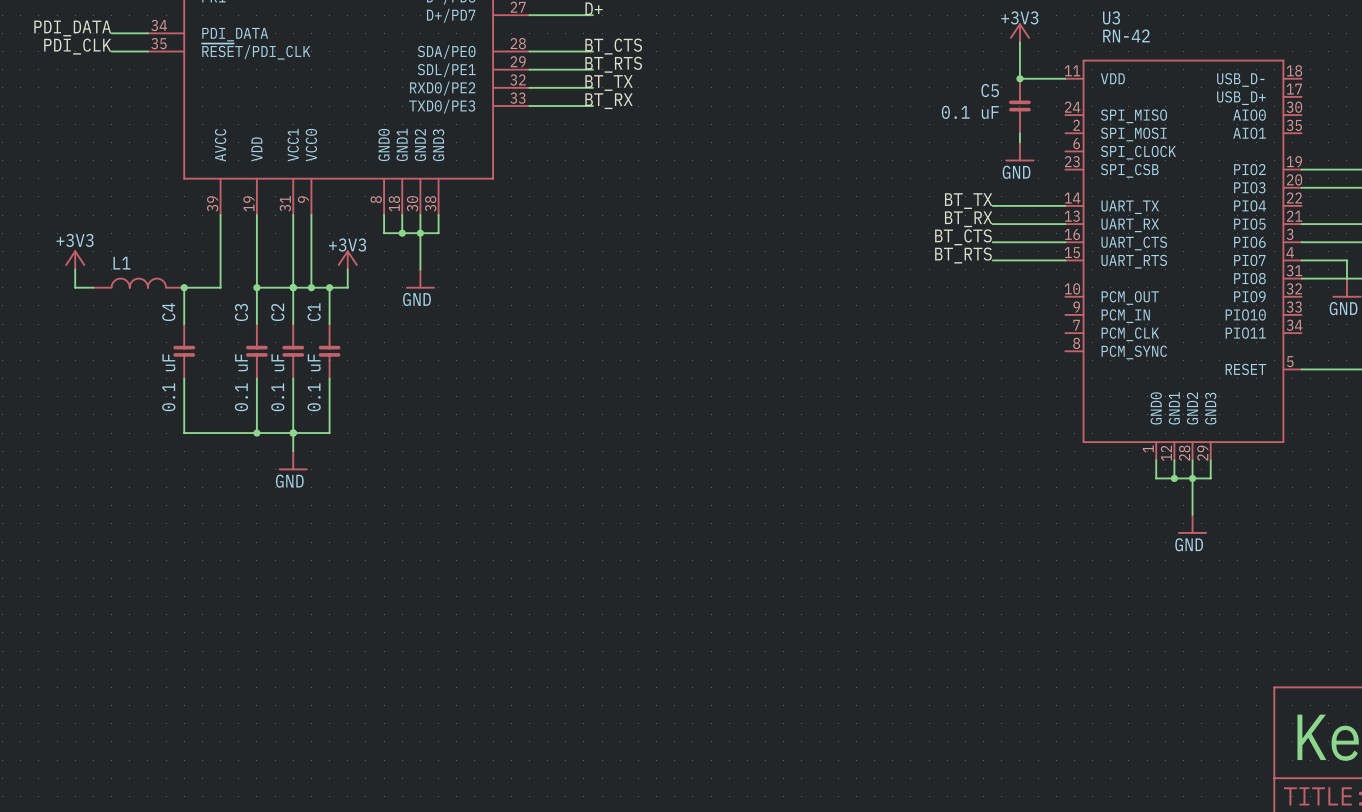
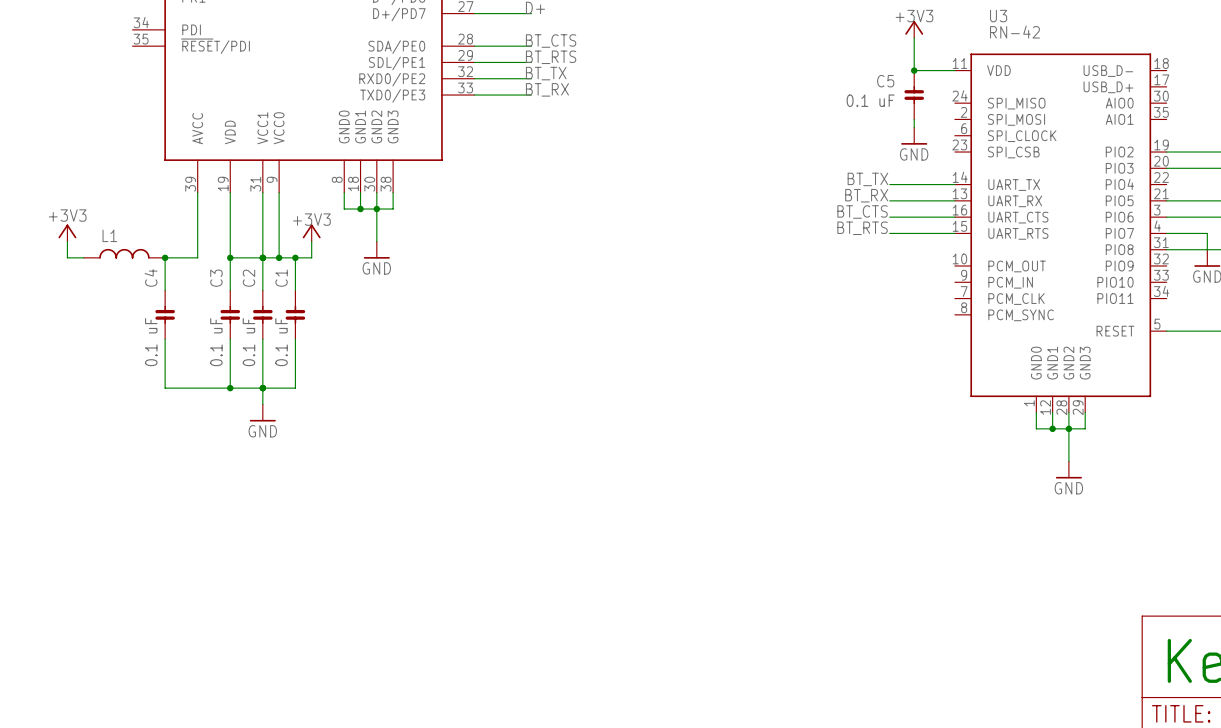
label: PDI_DATA (72, 28) -> none
wire: (111, 33) (147, 33) -> none
part pin name: PDI_DATA (235, 34) -> PDI (191, 29)
label: PDI_CLK (77, 46) -> none
wire: (111, 51) (147, 51) -> none
part pin name: ~{RESE}T/PDI_CLK (256, 51) -> ~{RESE}T/PDI (215, 46)

